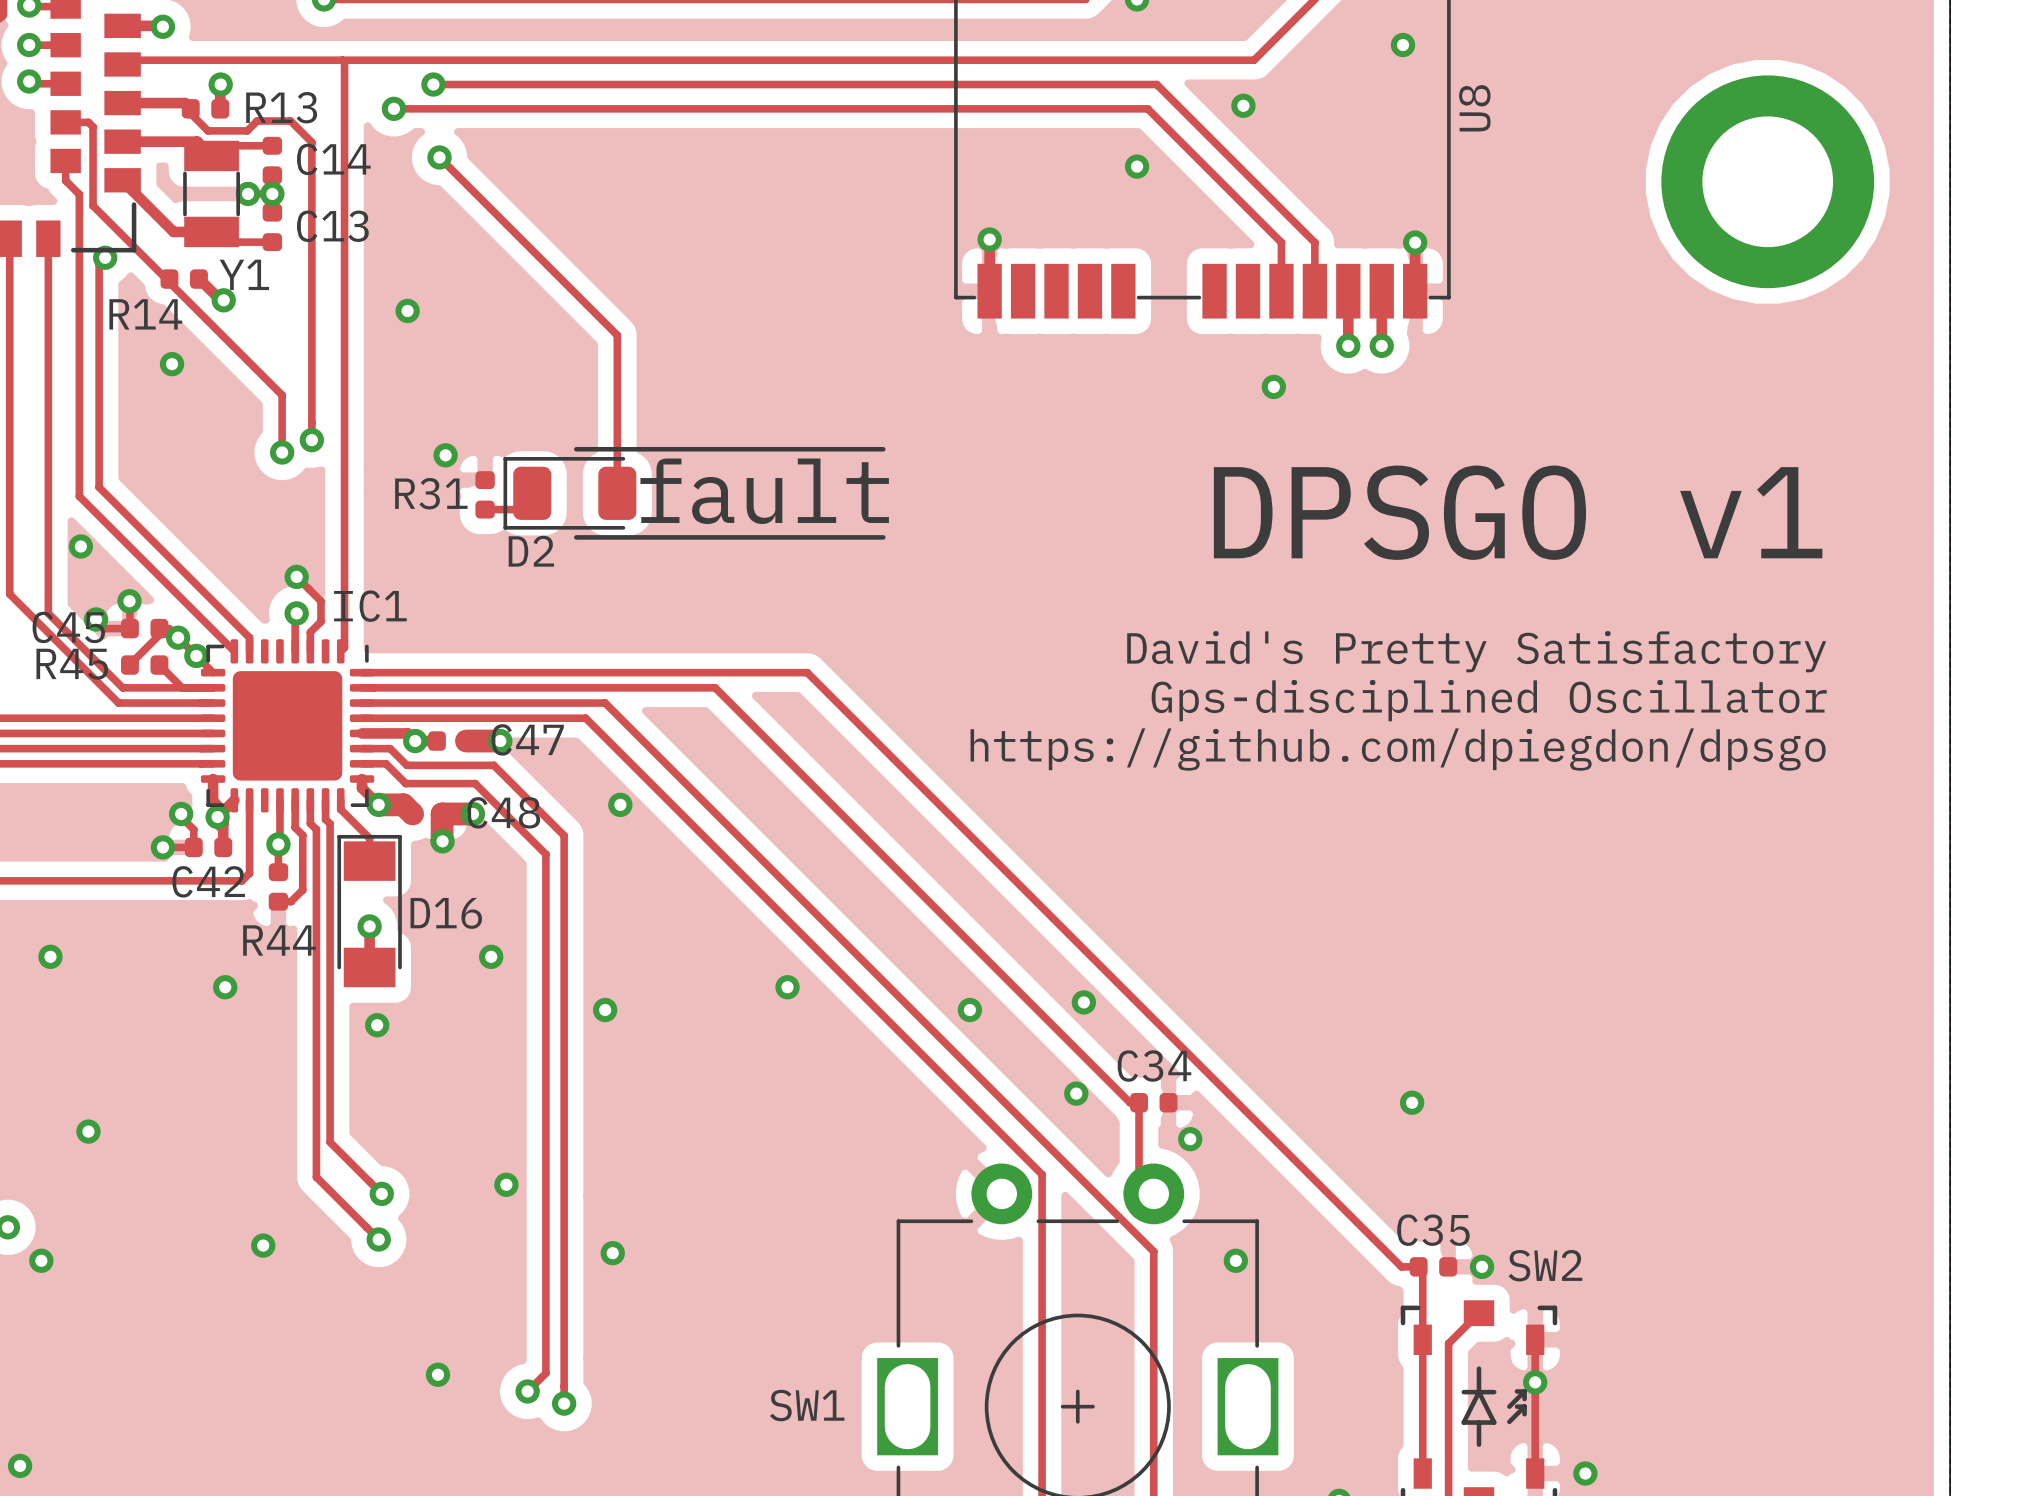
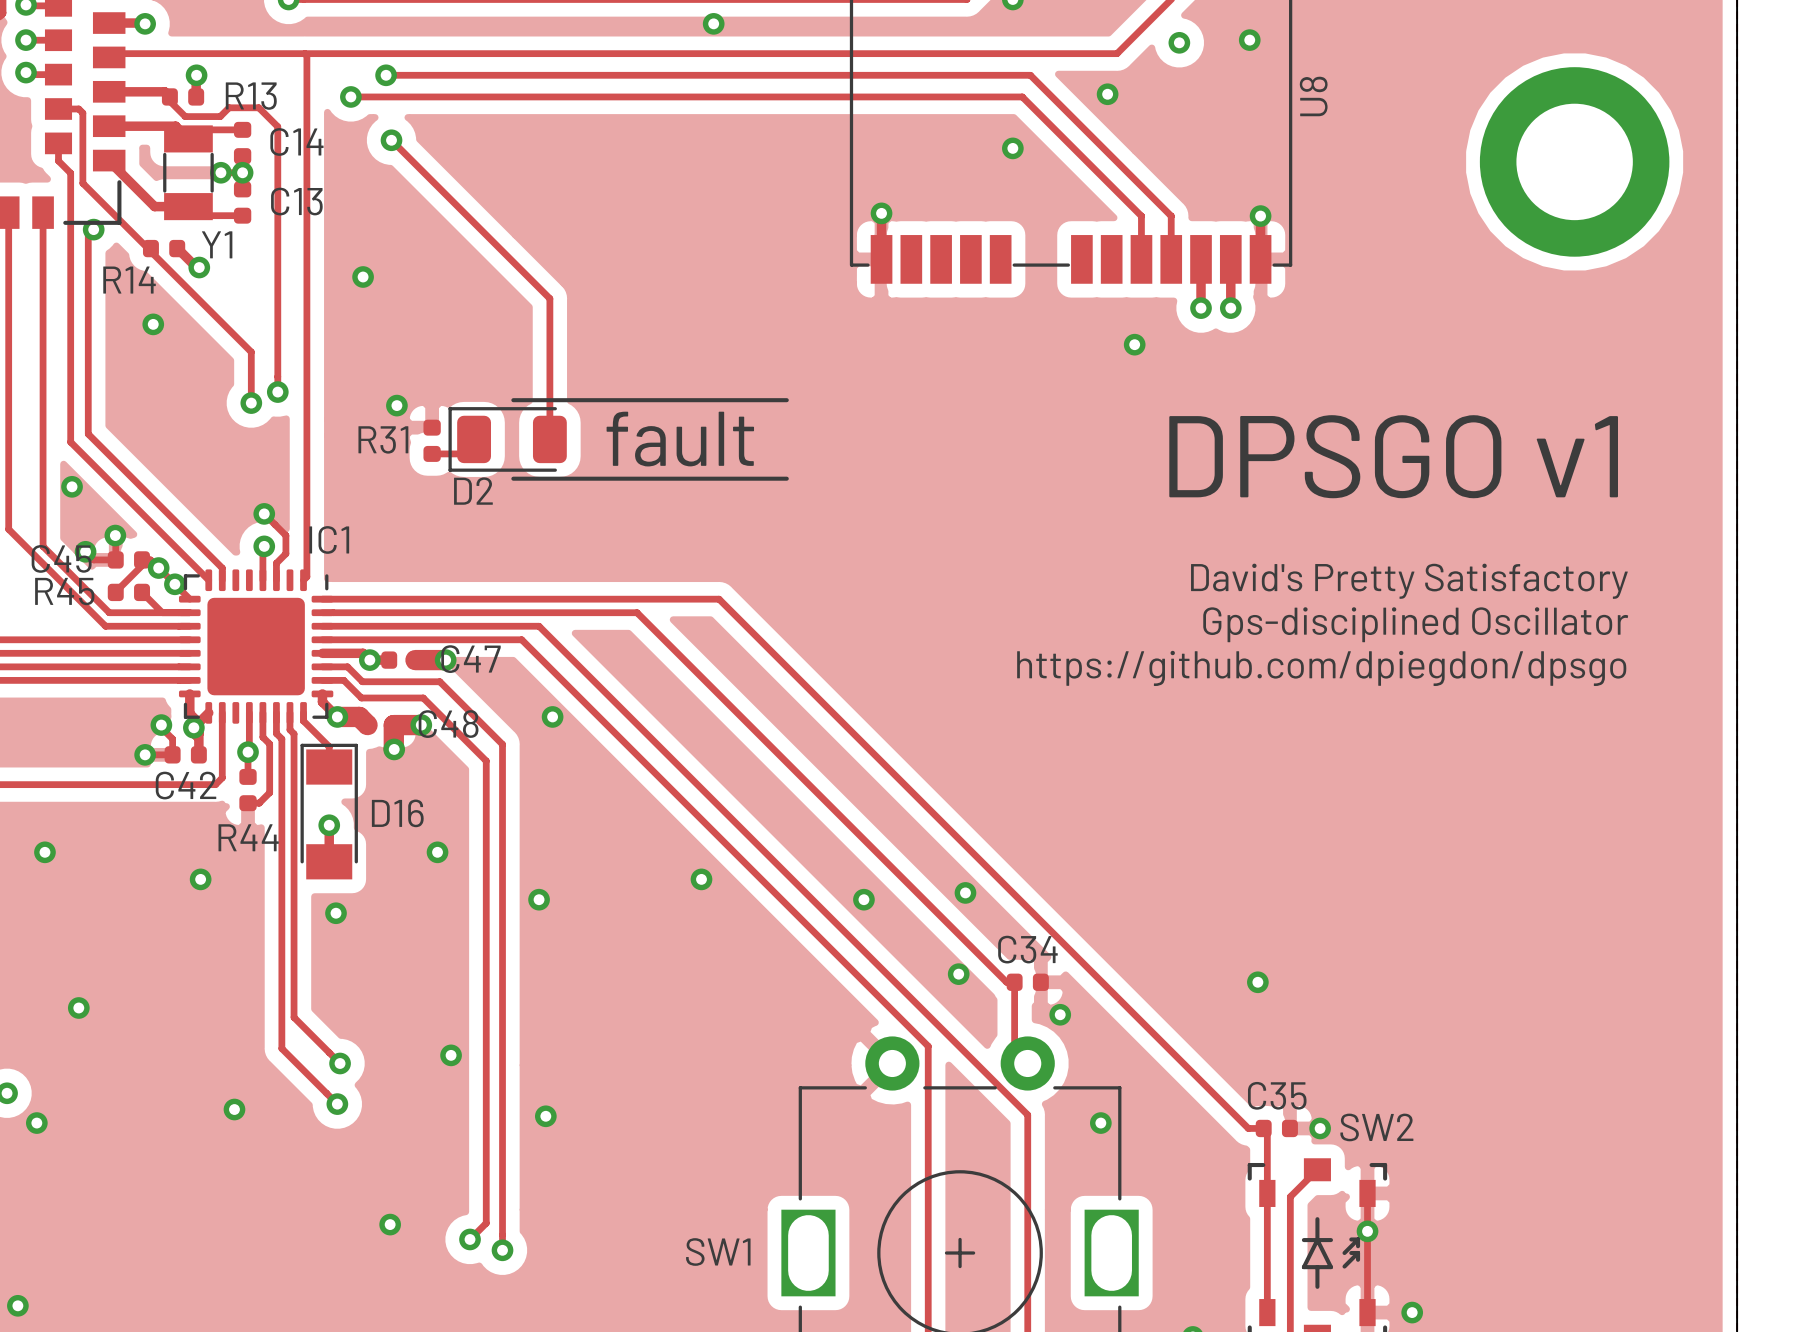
via: none -> (713, 23)
via: none -> (1179, 42)

